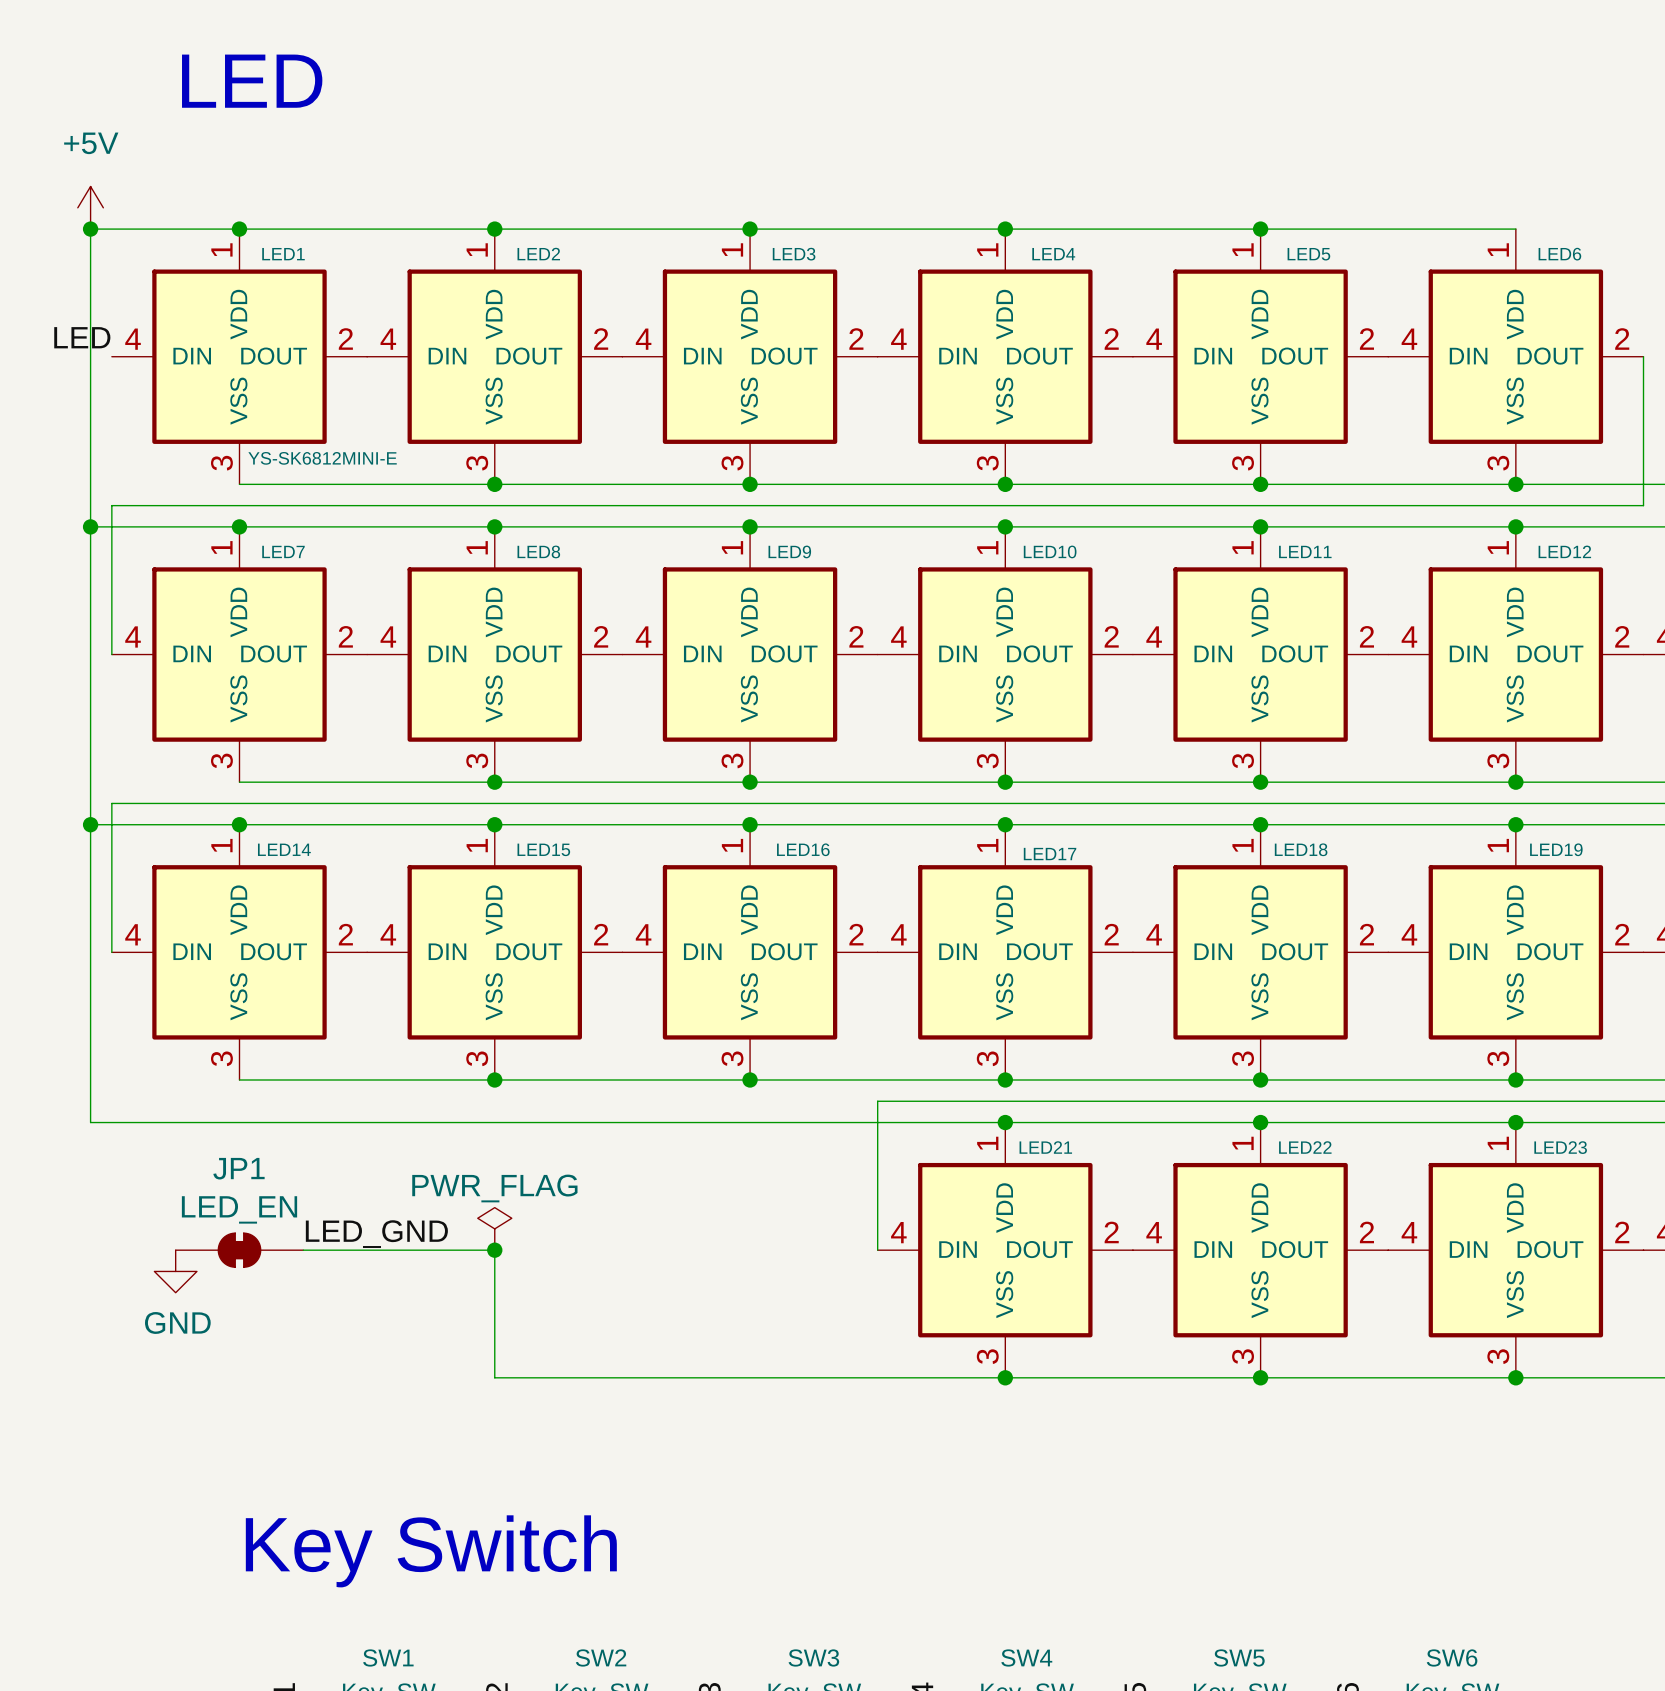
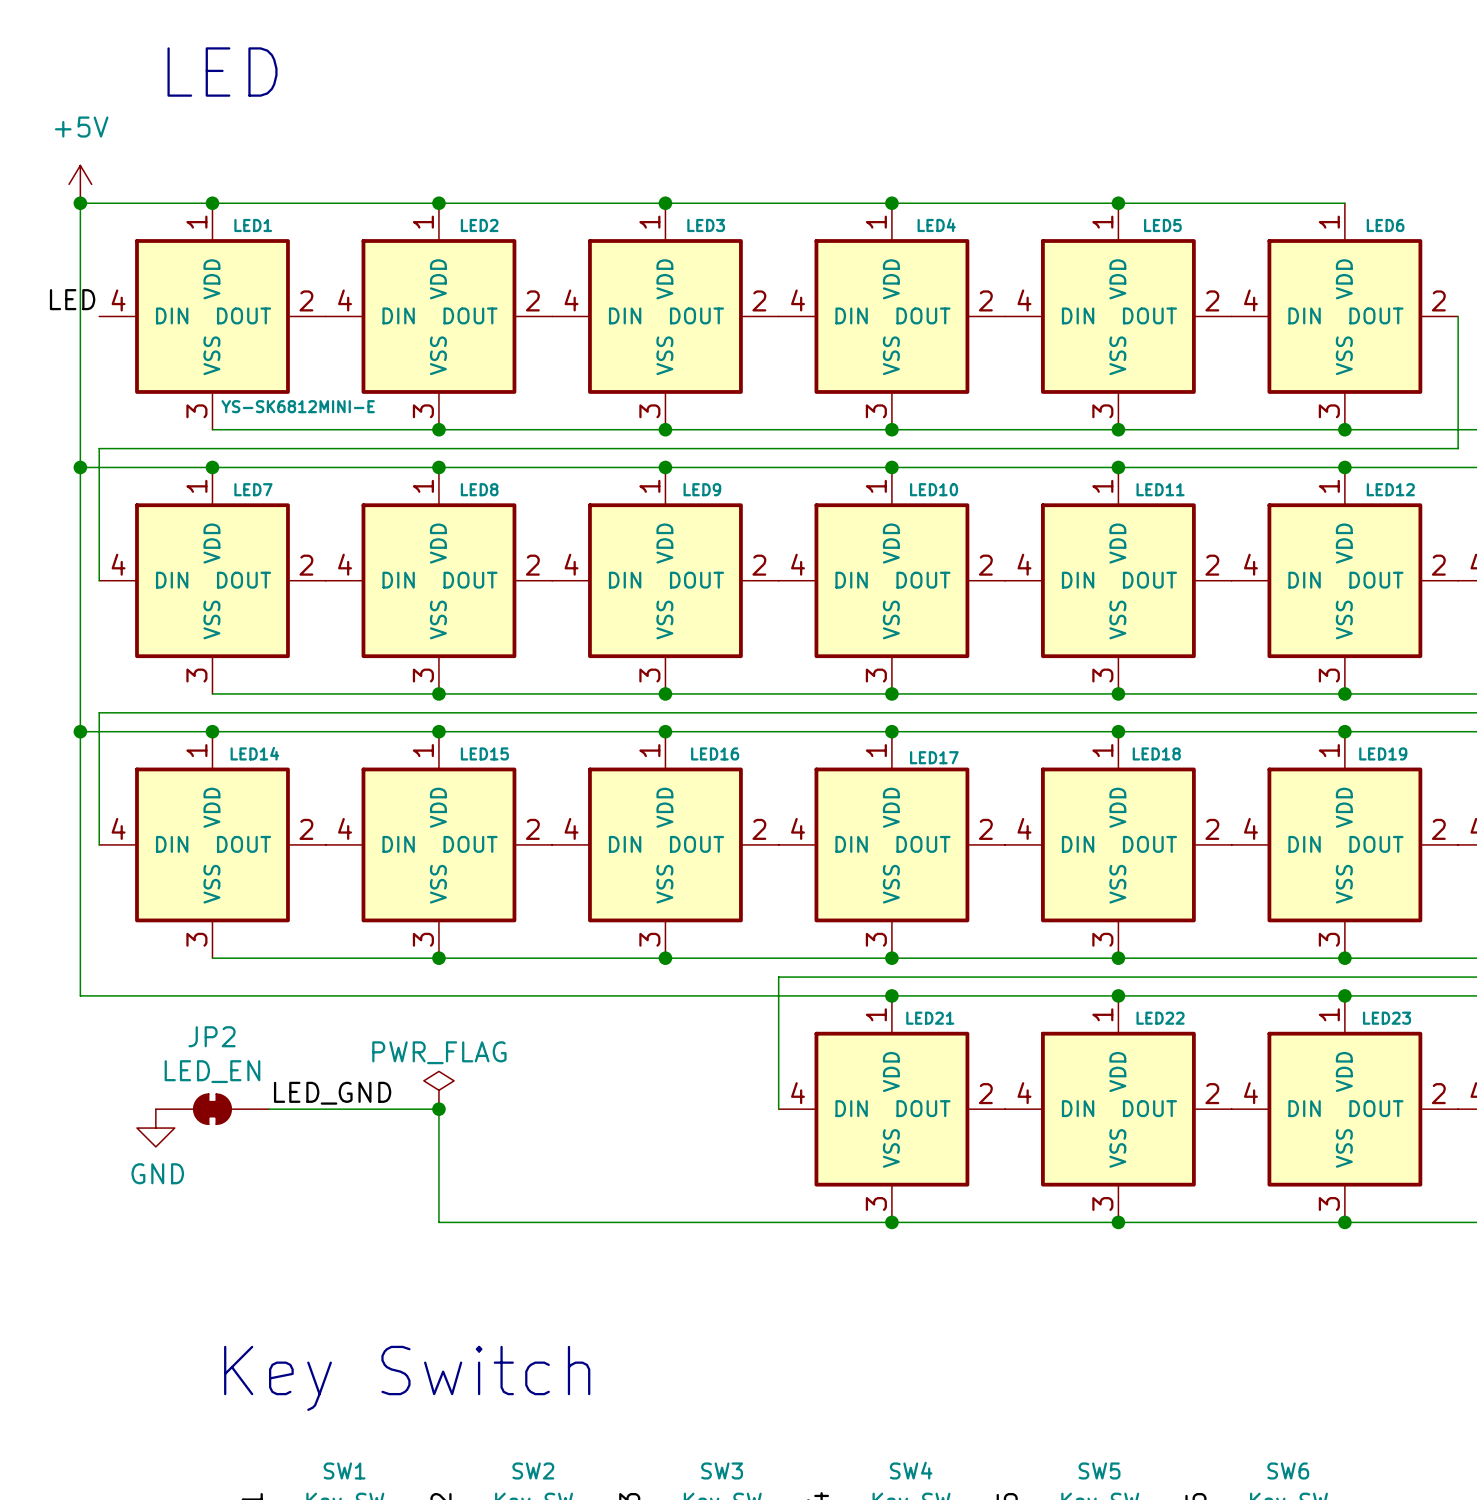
JP1 name: JP1 (238, 1168) -> JP2 (212, 1036)

